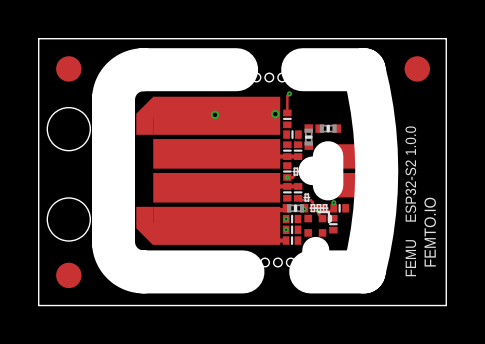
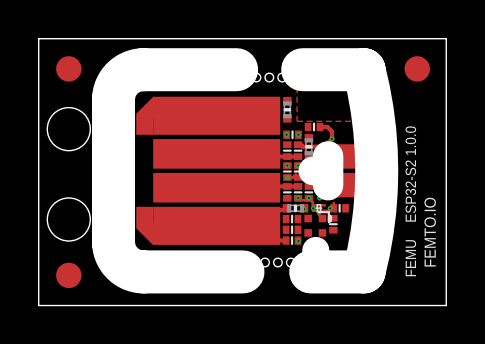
zone outline: none -> (297, 87) (297, 121) (358, 121) (358, 87) (297, 87)
track: (289, 93) (287, 96) (287, 112) -> none
via: (289, 93) -> none
part footprint: [282, 109, 292, 129] -> [283, 96, 292, 123]
via: (215, 114) -> none
via: (275, 114) -> none
part: none -> (314, 126)
track: none -> (319, 126) (327, 126) (332, 131) (332, 138) (325, 146) (302, 146) (298, 144)
part: (328, 128) -> none
via: none -> (286, 134)
via: none -> (298, 134)
part: (308, 137) -> none
via: none -> (332, 138)
part: none -> (308, 146)
via: none -> (287, 165)
via: none -> (298, 165)
part footprint: [292, 167, 300, 176] -> [293, 162, 303, 181]
part footprint: [303, 193, 311, 202] -> [304, 183, 314, 202]
via: none -> (298, 198)
via: none -> (308, 198)
via: none -> (319, 198)
via: (333, 202) -> none
part: (312, 208) -> none
via: none -> (313, 208)
part: (325, 208) -> none
via: none -> (330, 208)
via: (286, 219) -> none
via: (286, 229) -> none
via: none -> (298, 241)

